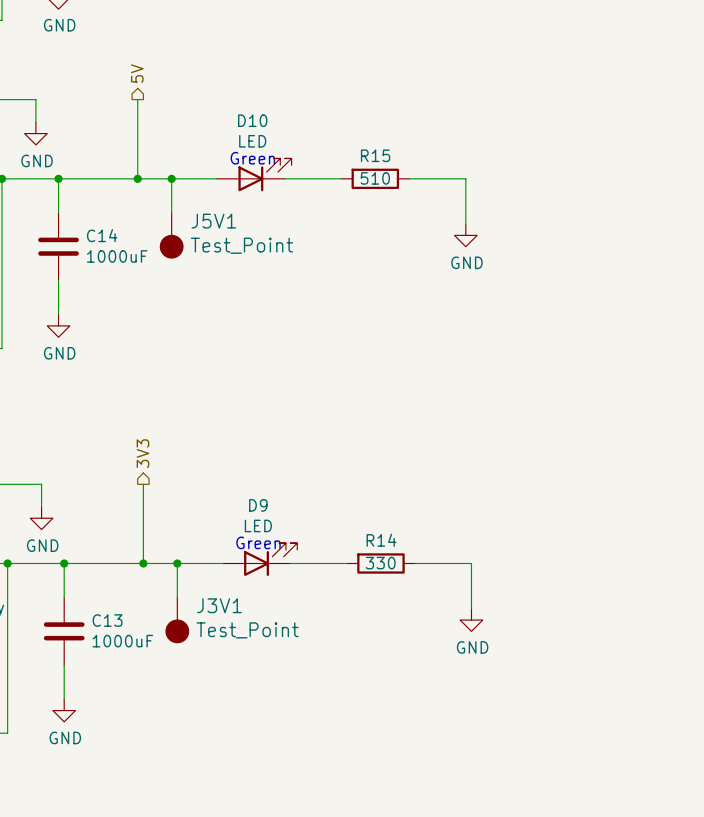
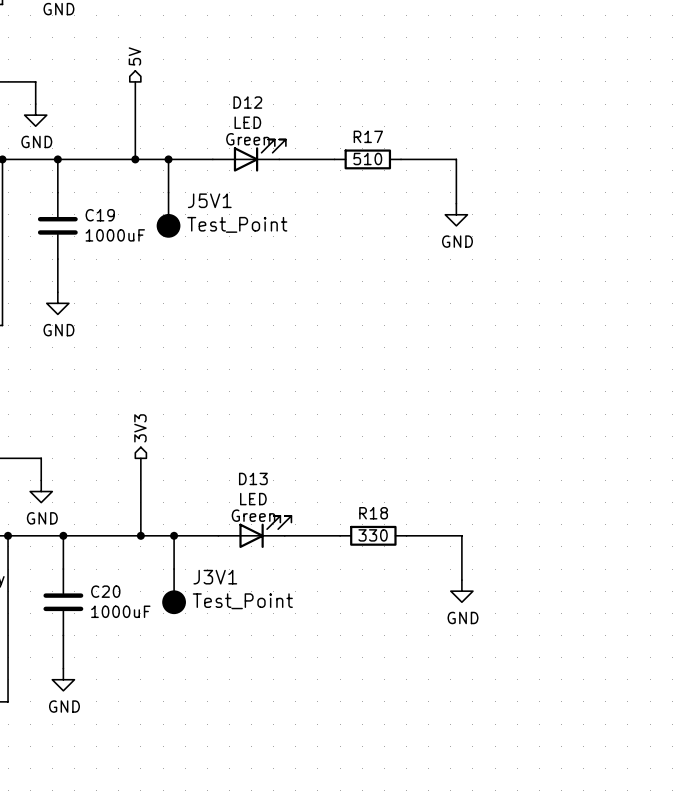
D10 name: D10 (252, 120) -> D12 (247, 102)
R15 name: R15 (375, 155) -> R17 (368, 136)
C14 name: C14 (102, 235) -> C19 (100, 215)
D9 name: D9 (258, 505) -> D13 (253, 478)
R14 name: R14 (381, 540) -> R18 (373, 513)
C13 name: C13 (107, 620) -> C20 (105, 591)

